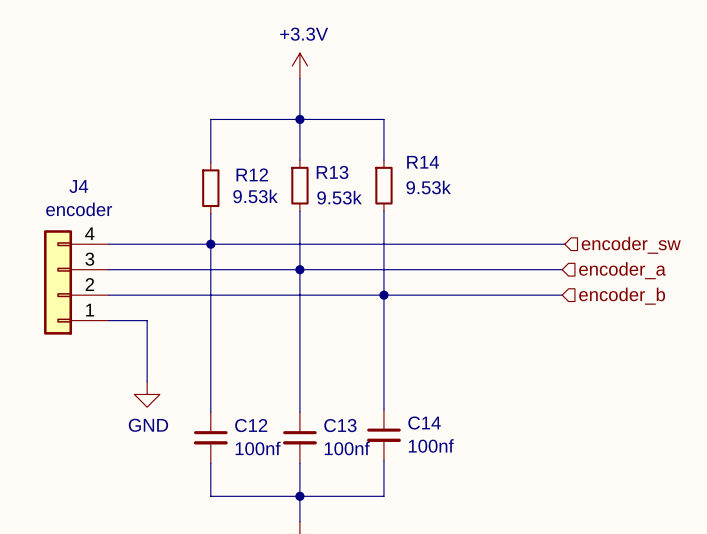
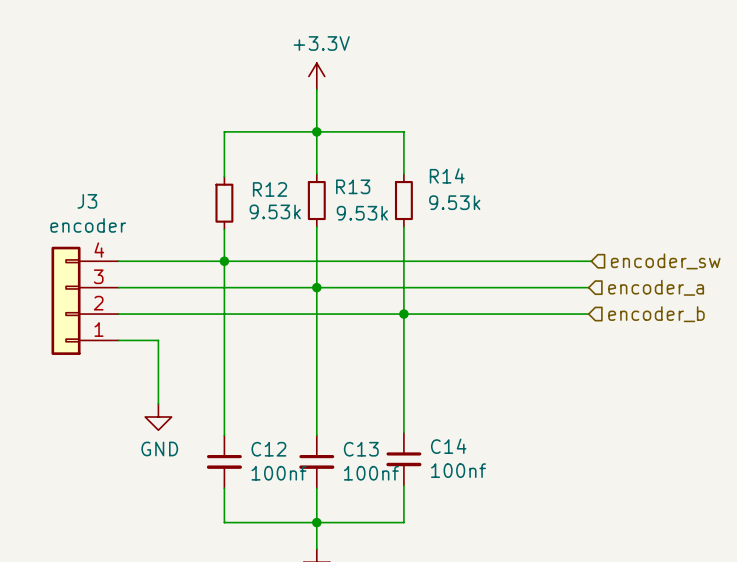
J4 name: J4 (78, 186) -> J3 (87, 201)

